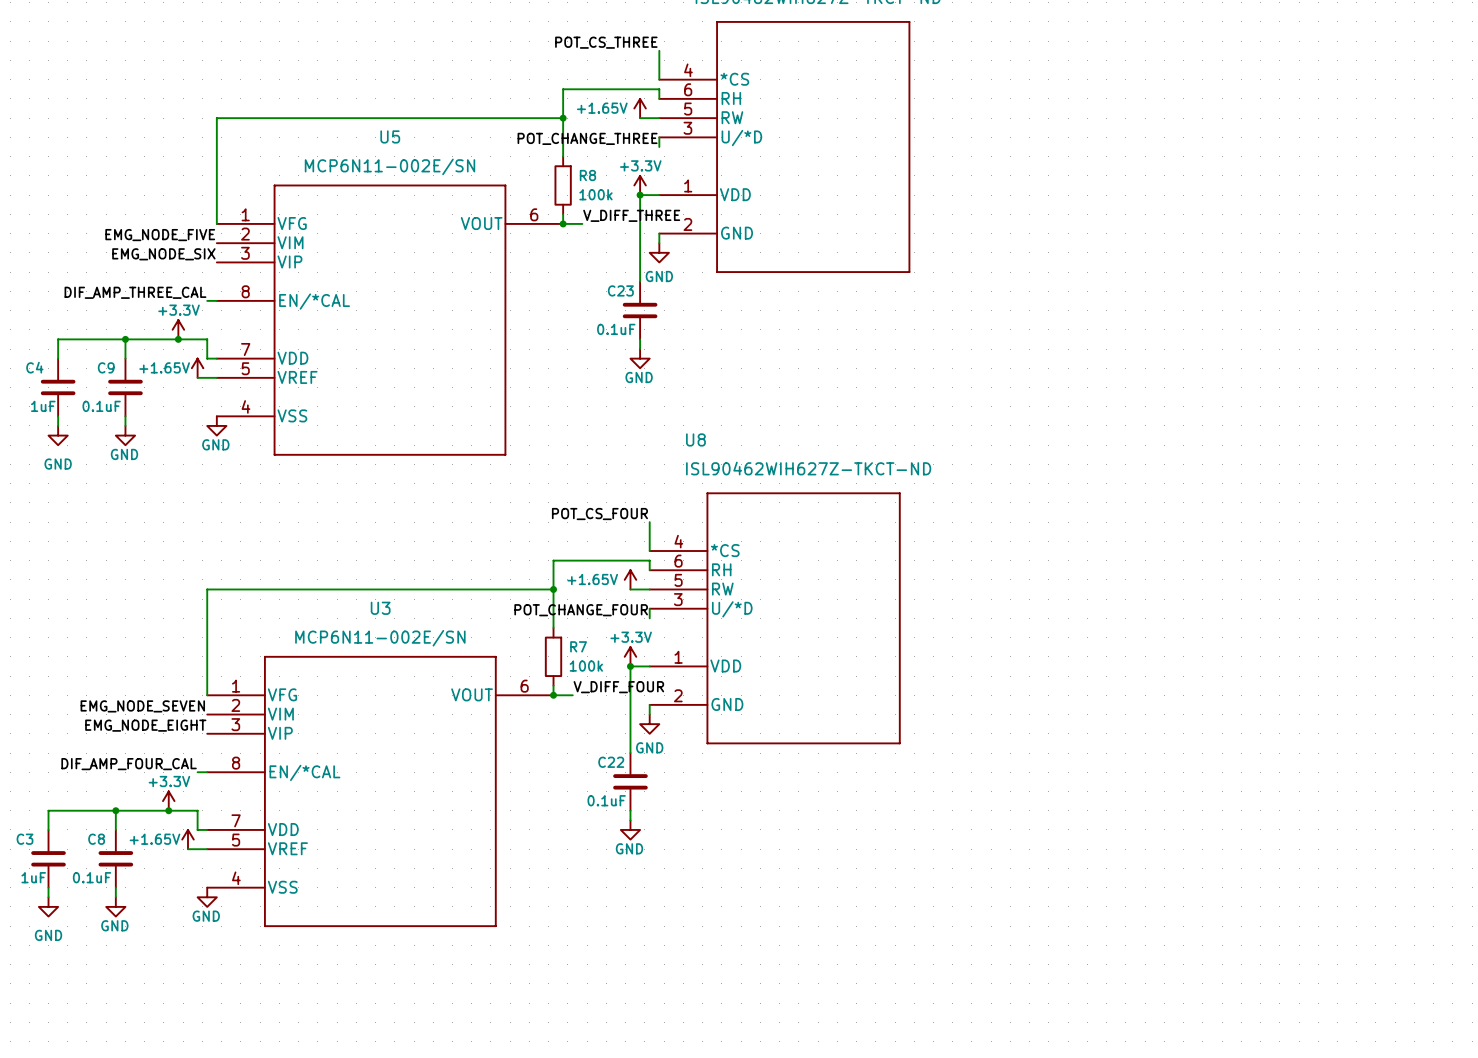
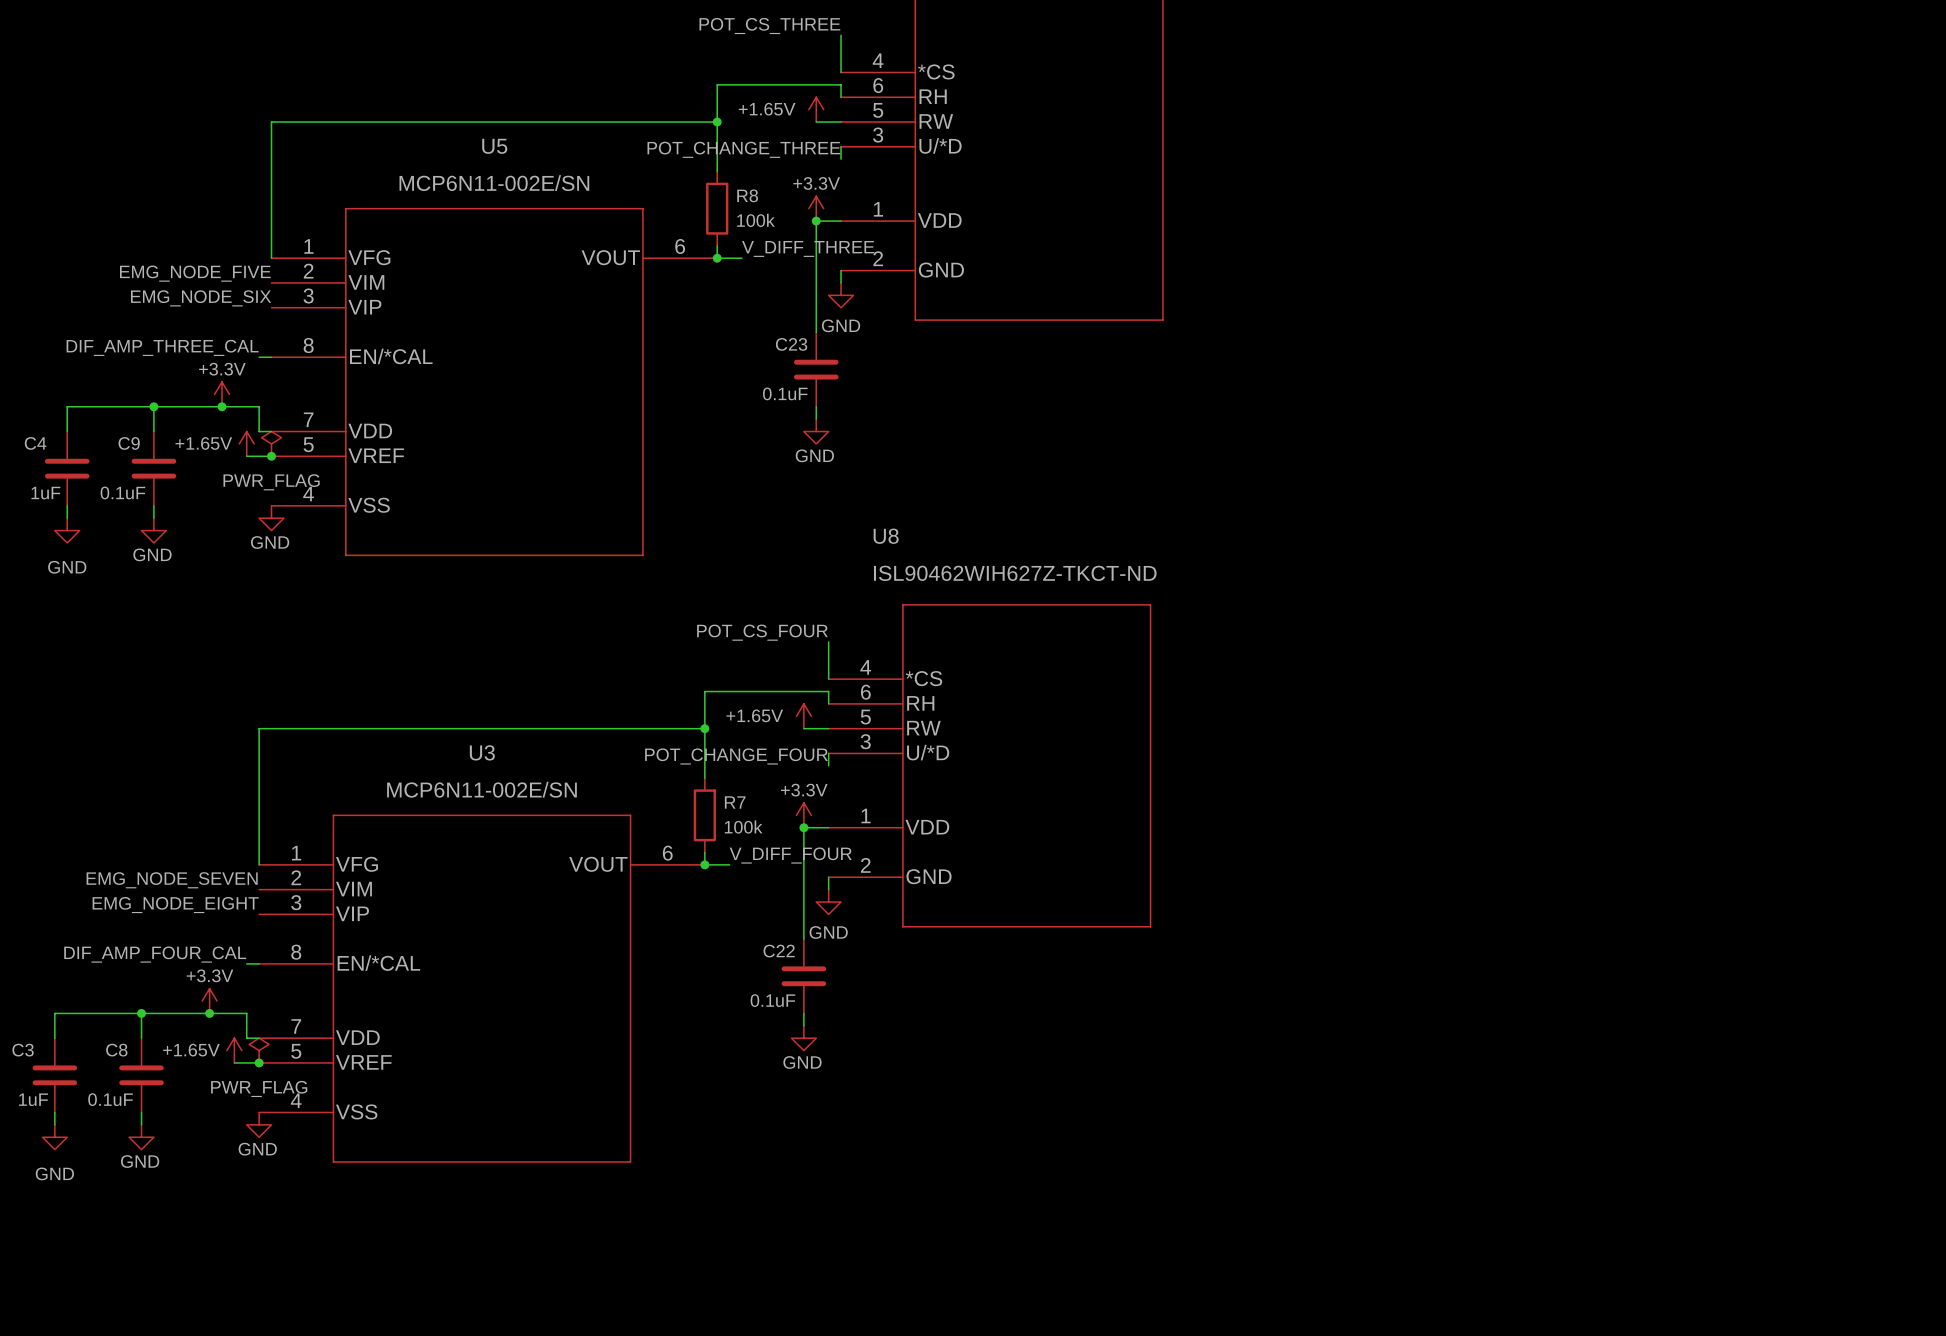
power symbol: none -> PWR_FLAG (271, 443)
junction: none -> (271, 456)
power symbol: none -> PWR_FLAG (259, 1050)
junction: none -> (259, 1062)

